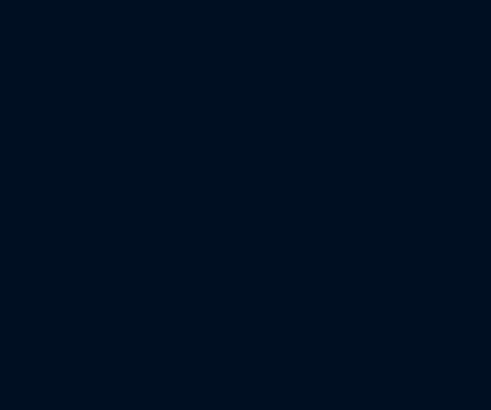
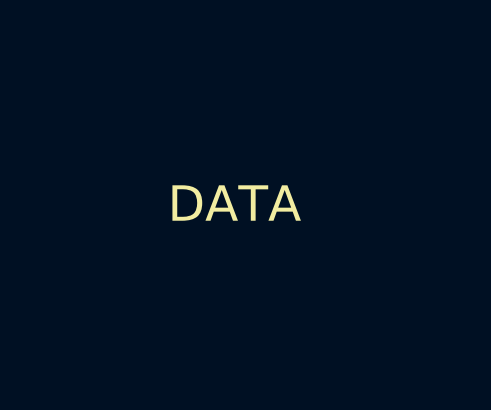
text: none -> DATA (236, 203)

